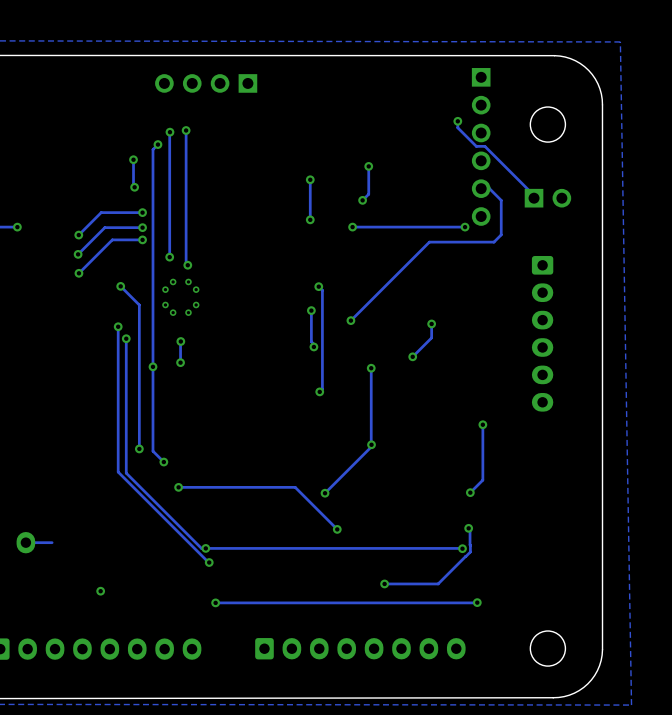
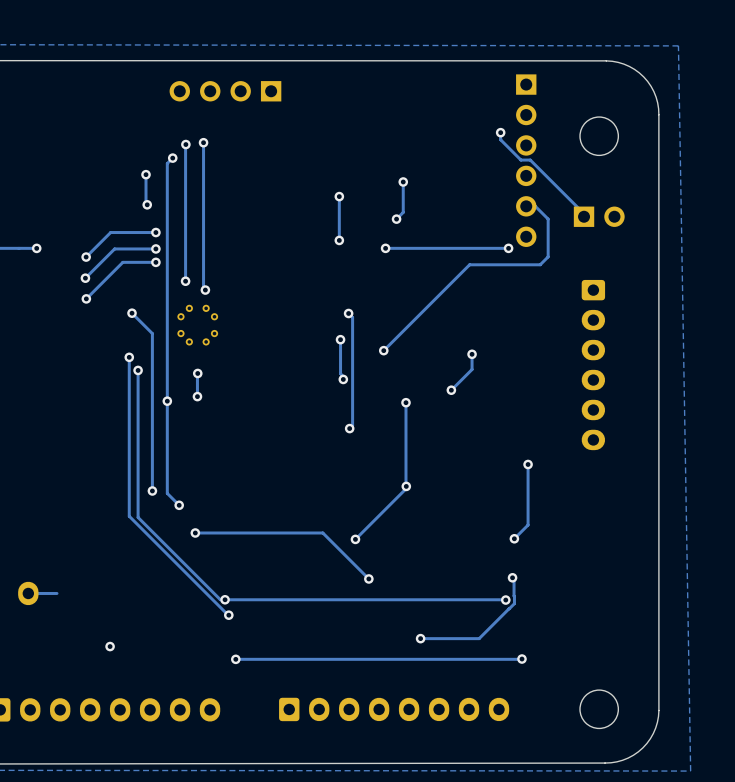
via: (17, 227) -> none
track: none -> (36, 248) (18, 248)
via: none -> (36, 248)

